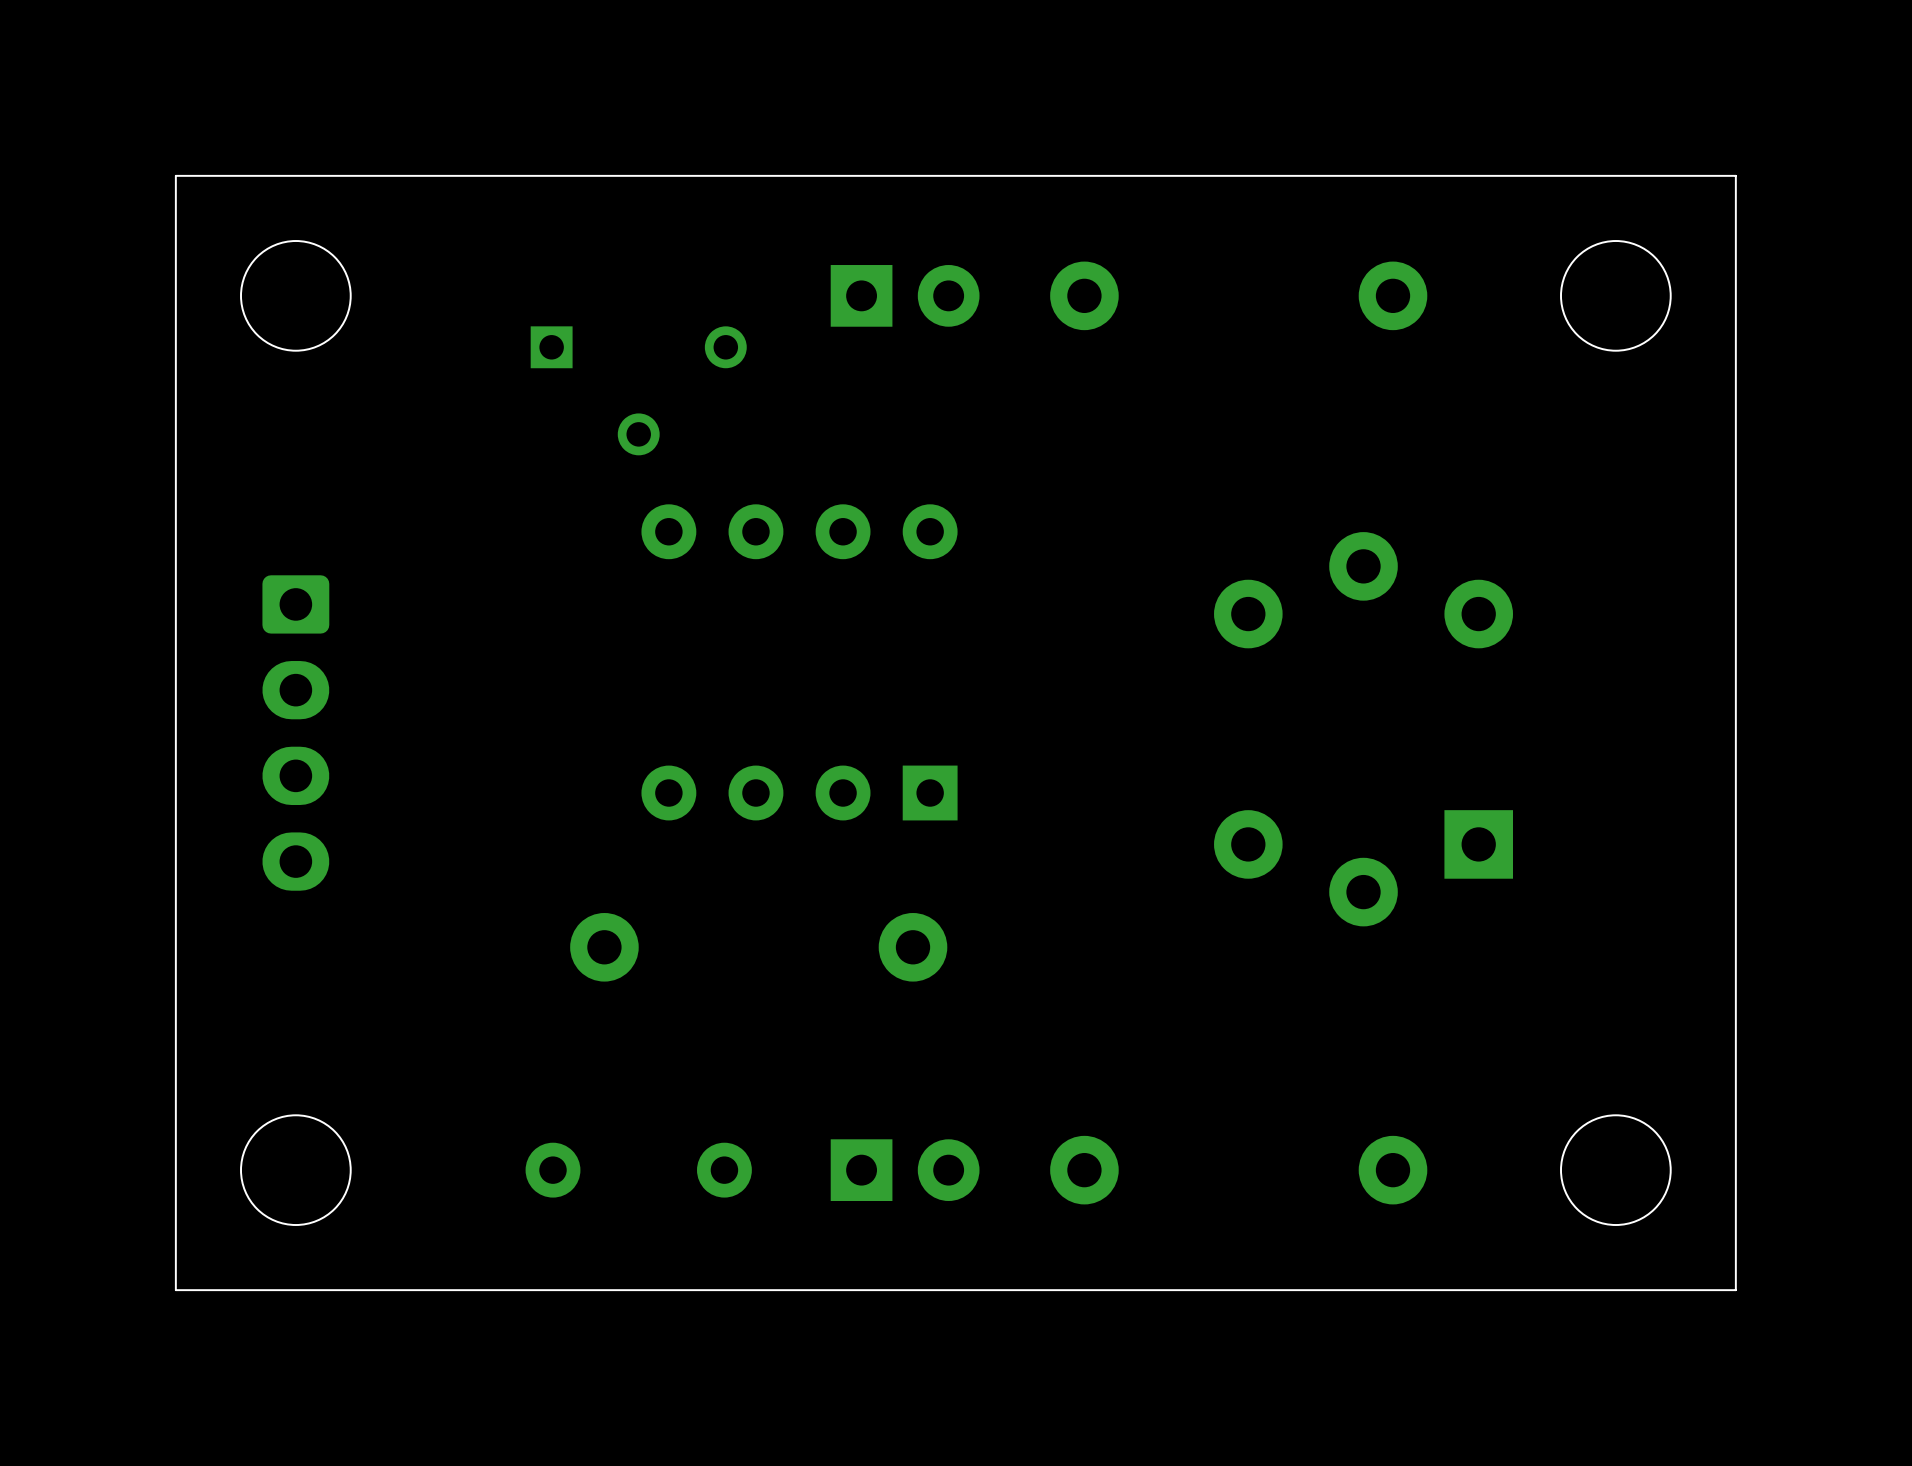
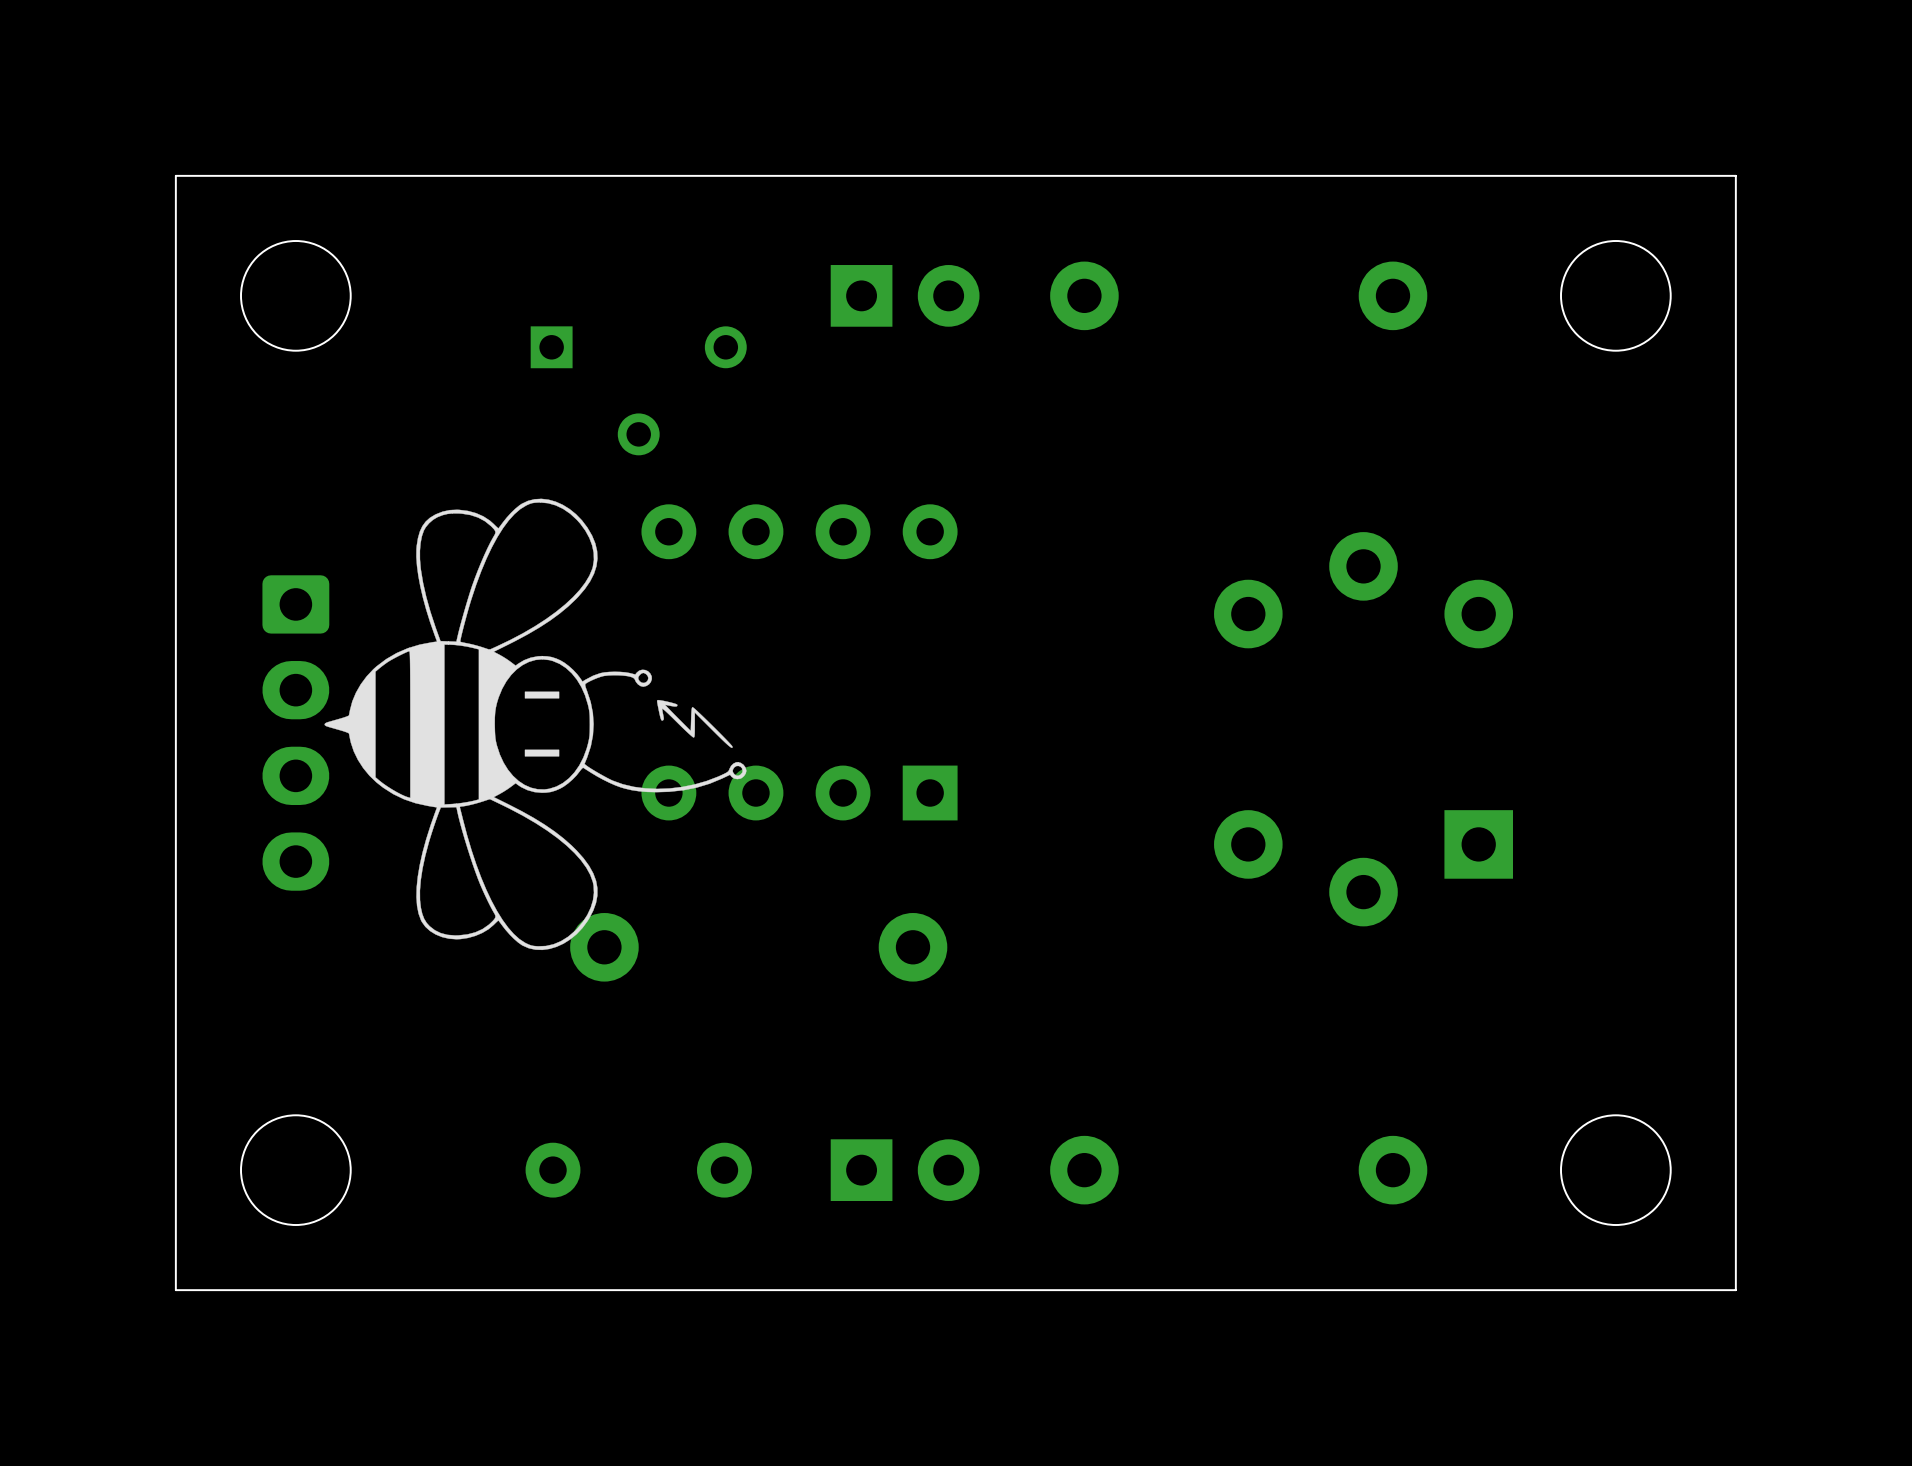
drawing: none -> [324, 498, 747, 951]

